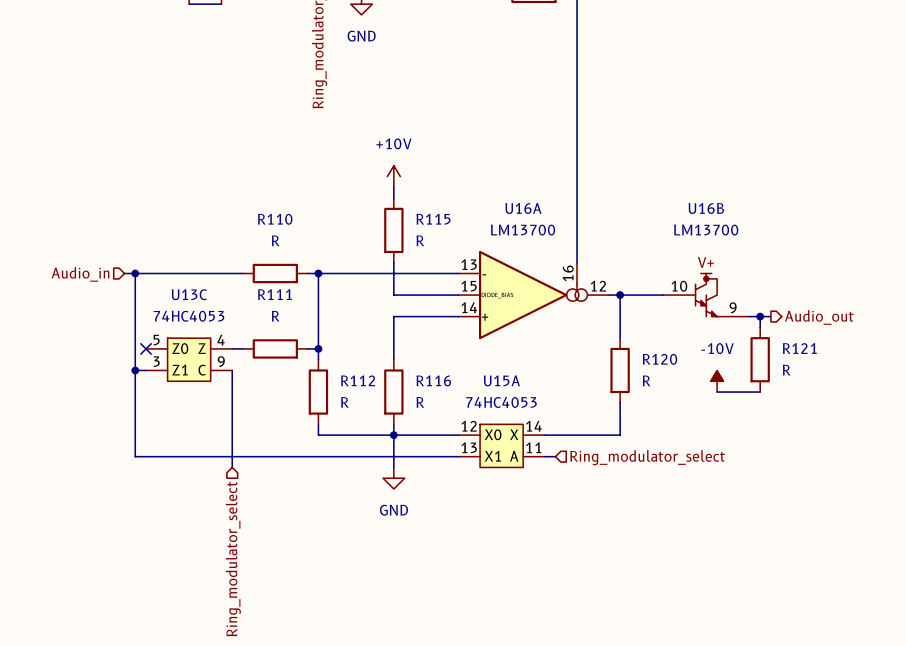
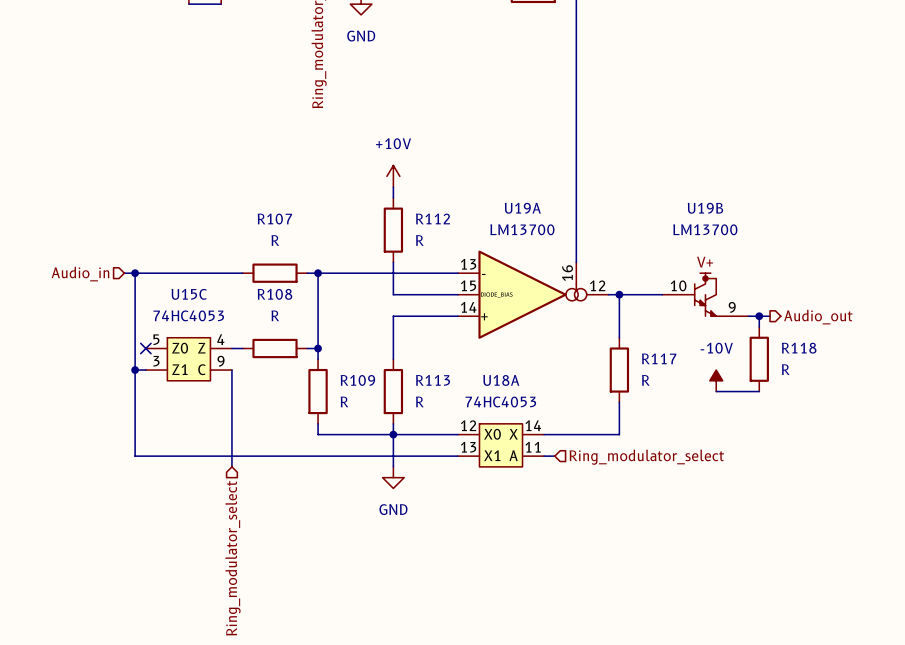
U16A name: U16A (523, 208) -> U19A (522, 208)
U16B name: U16B (706, 208) -> U19B (705, 208)
R110 name: R110 (275, 219) -> R107 (274, 219)
R115 name: R115 (433, 219) -> R112 (433, 218)
U13C name: U13C (189, 294) -> U15C (189, 294)
R111 name: R111 (275, 294) -> R108 (274, 294)
R121 name: R121 (799, 348) -> R118 (799, 348)
R120 name: R120 (659, 359) -> R117 (659, 358)
R112 name: R112 (358, 380) -> R109 (357, 380)
R116 name: R116 (433, 380) -> R113 (433, 380)
U15A name: U15A (501, 380) -> U18A (501, 380)

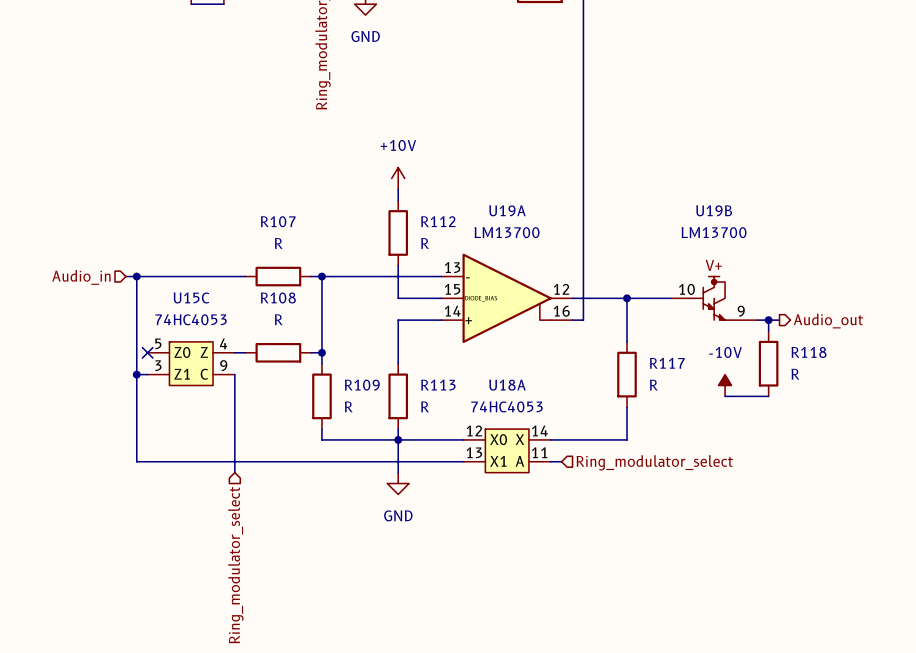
U19A symbol: [457, 250, 609, 339] -> [441, 253, 573, 343]
wire: none -> (583, 265) (583, 320) (572, 320)

